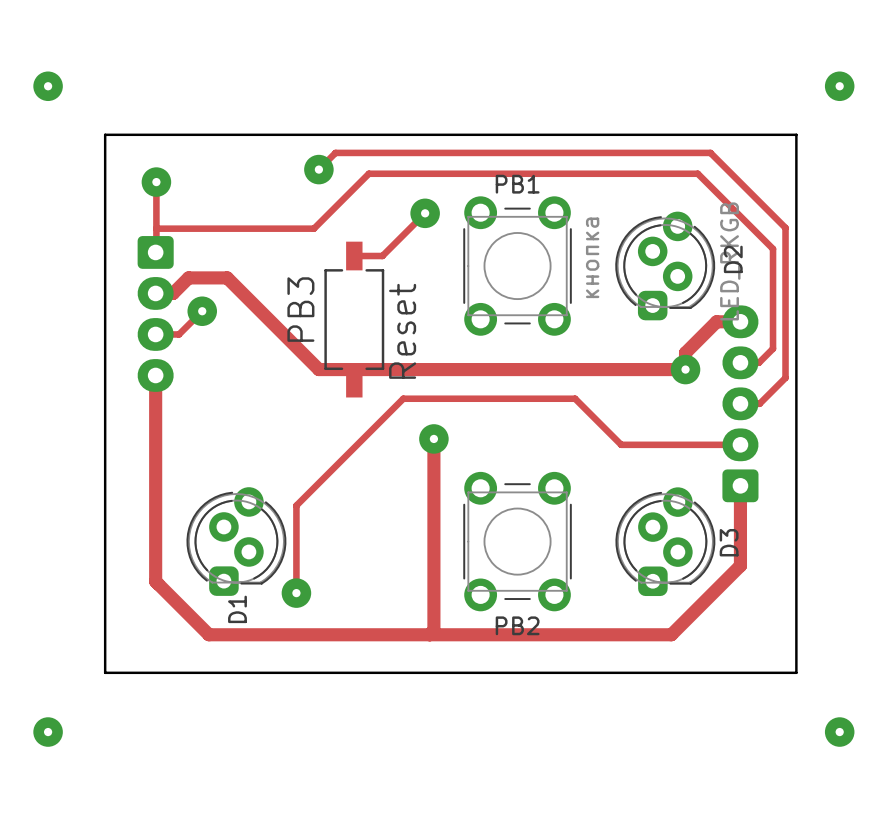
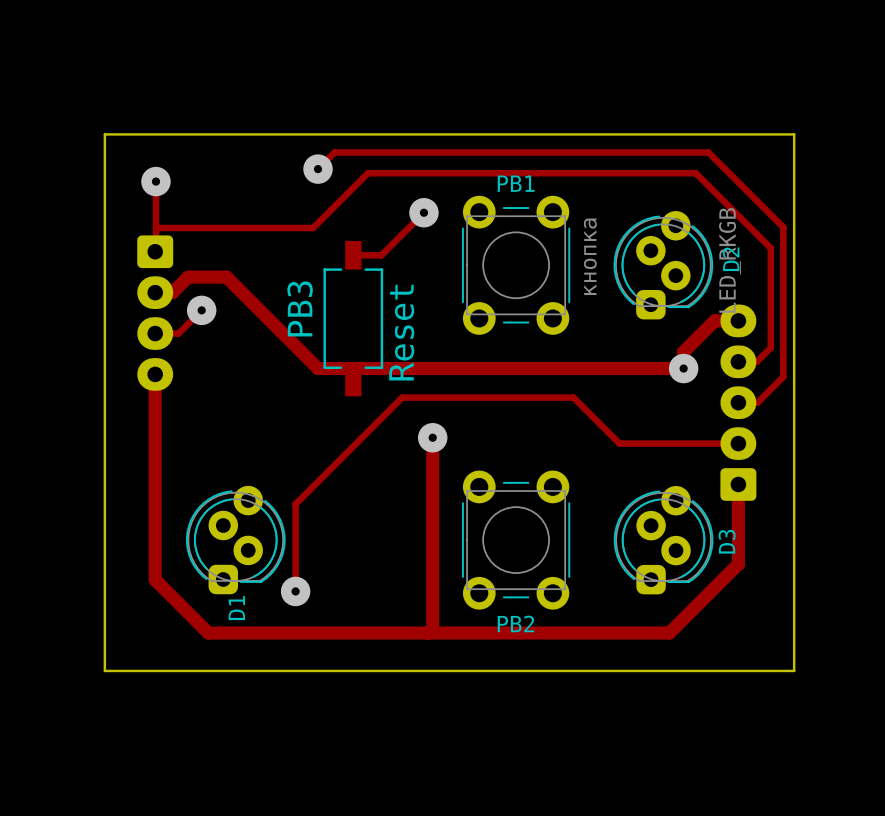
via: (48, 86) -> none
via: (839, 86) -> none
via: (48, 732) -> none
via: (839, 732) -> none

